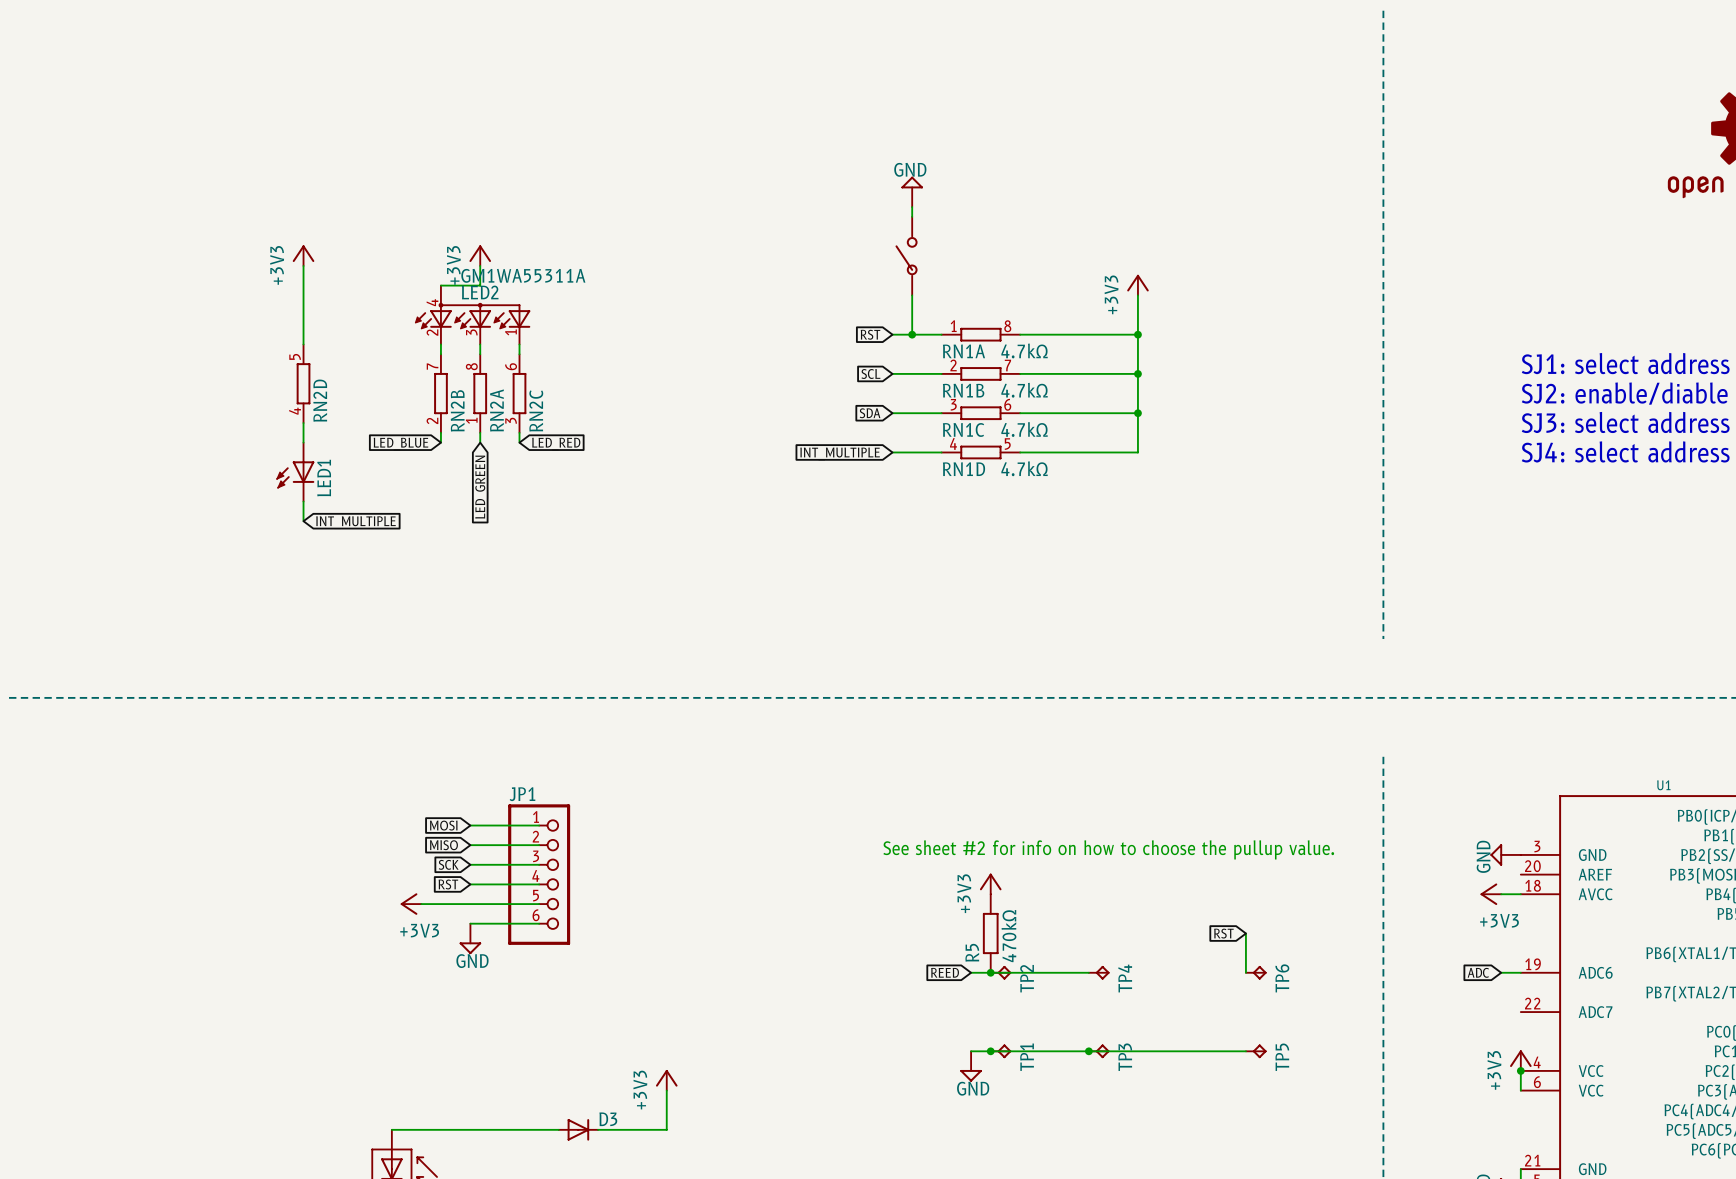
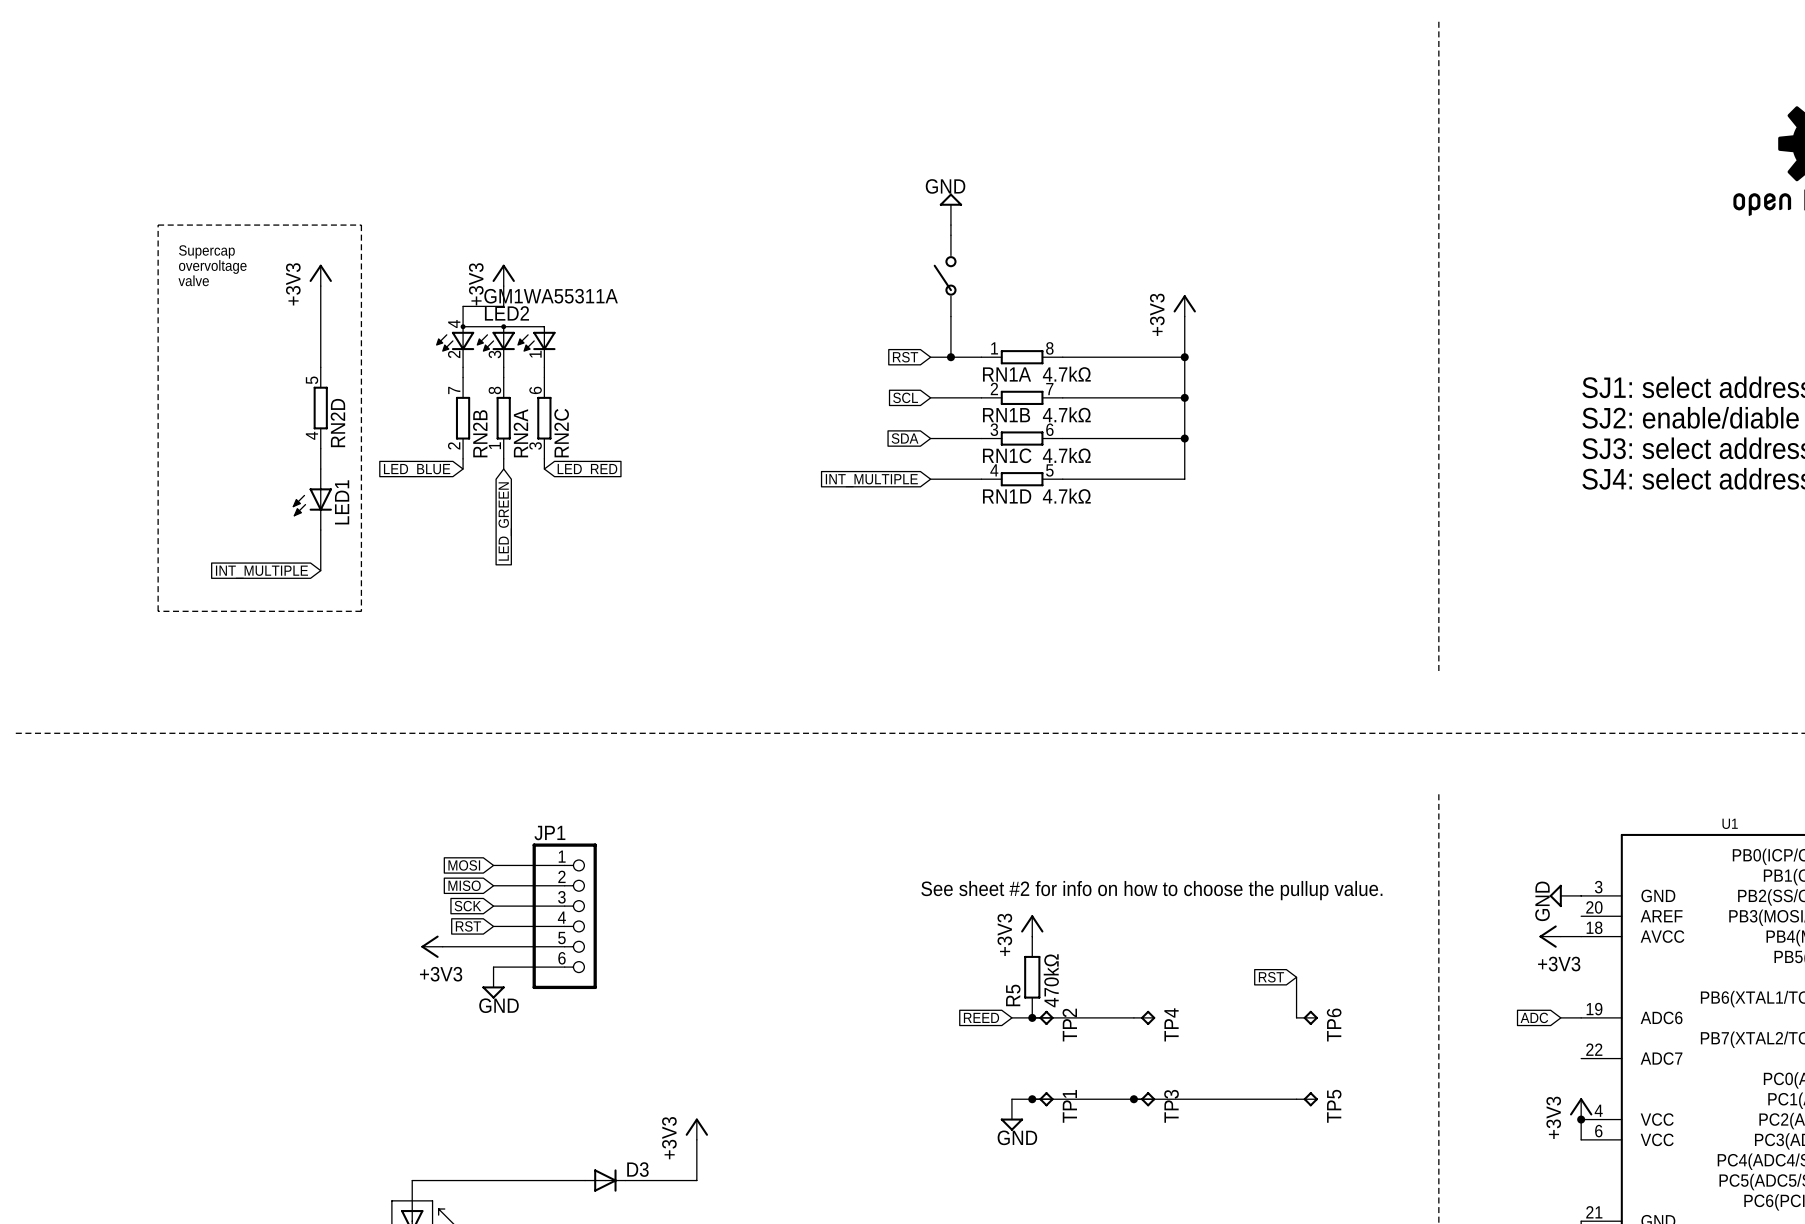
wire: none -> (158, 225) (361, 225) (361, 611) (158, 611) (158, 225)
text: none -> Supercap (206, 251)
text: none -> overvoltage (212, 266)
text: none -> valve (193, 280)
wire: none -> (320, 550) (320, 570)
global label rotation: 0° (356, 522) -> 180° (261, 572)
global label position: INT_MULTIPLE (356, 522) -> INT_MULTIPLE (261, 572)

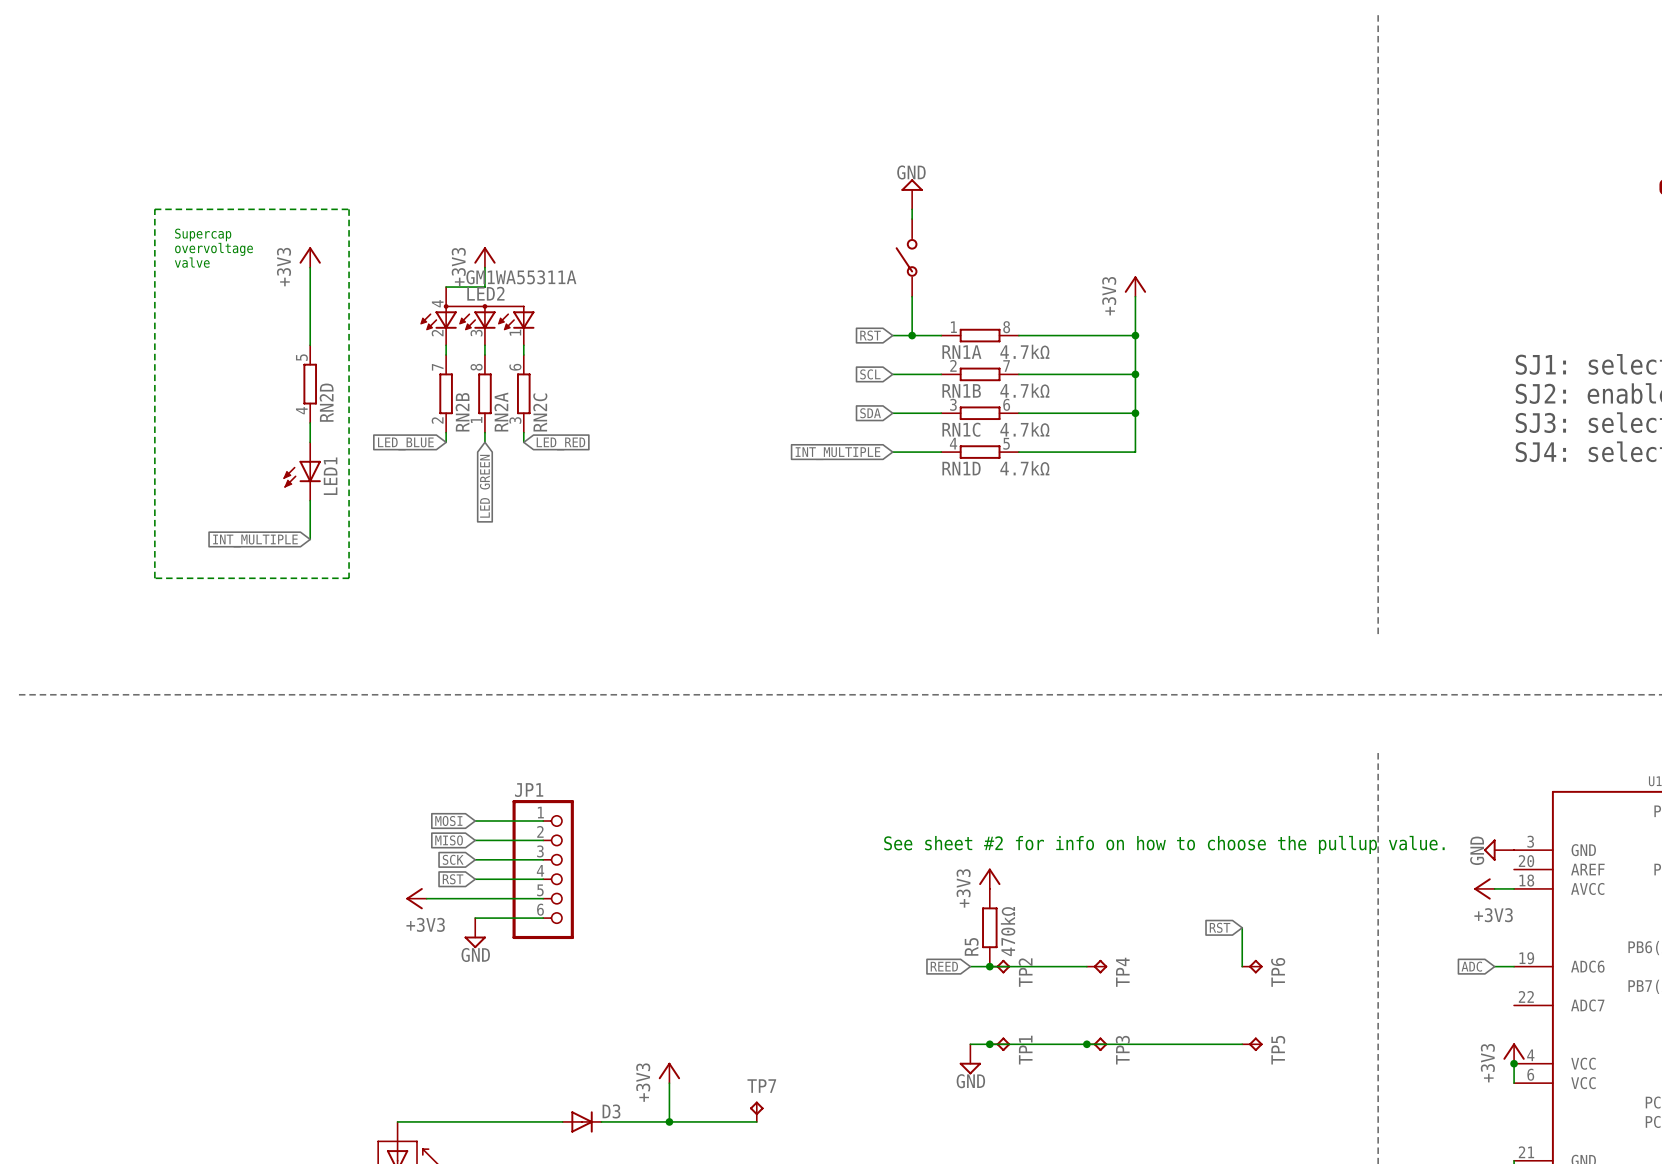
TP7: none -> (756, 1111)
wire: none -> (669, 1121) (756, 1121)
junction: none -> (669, 1121)

